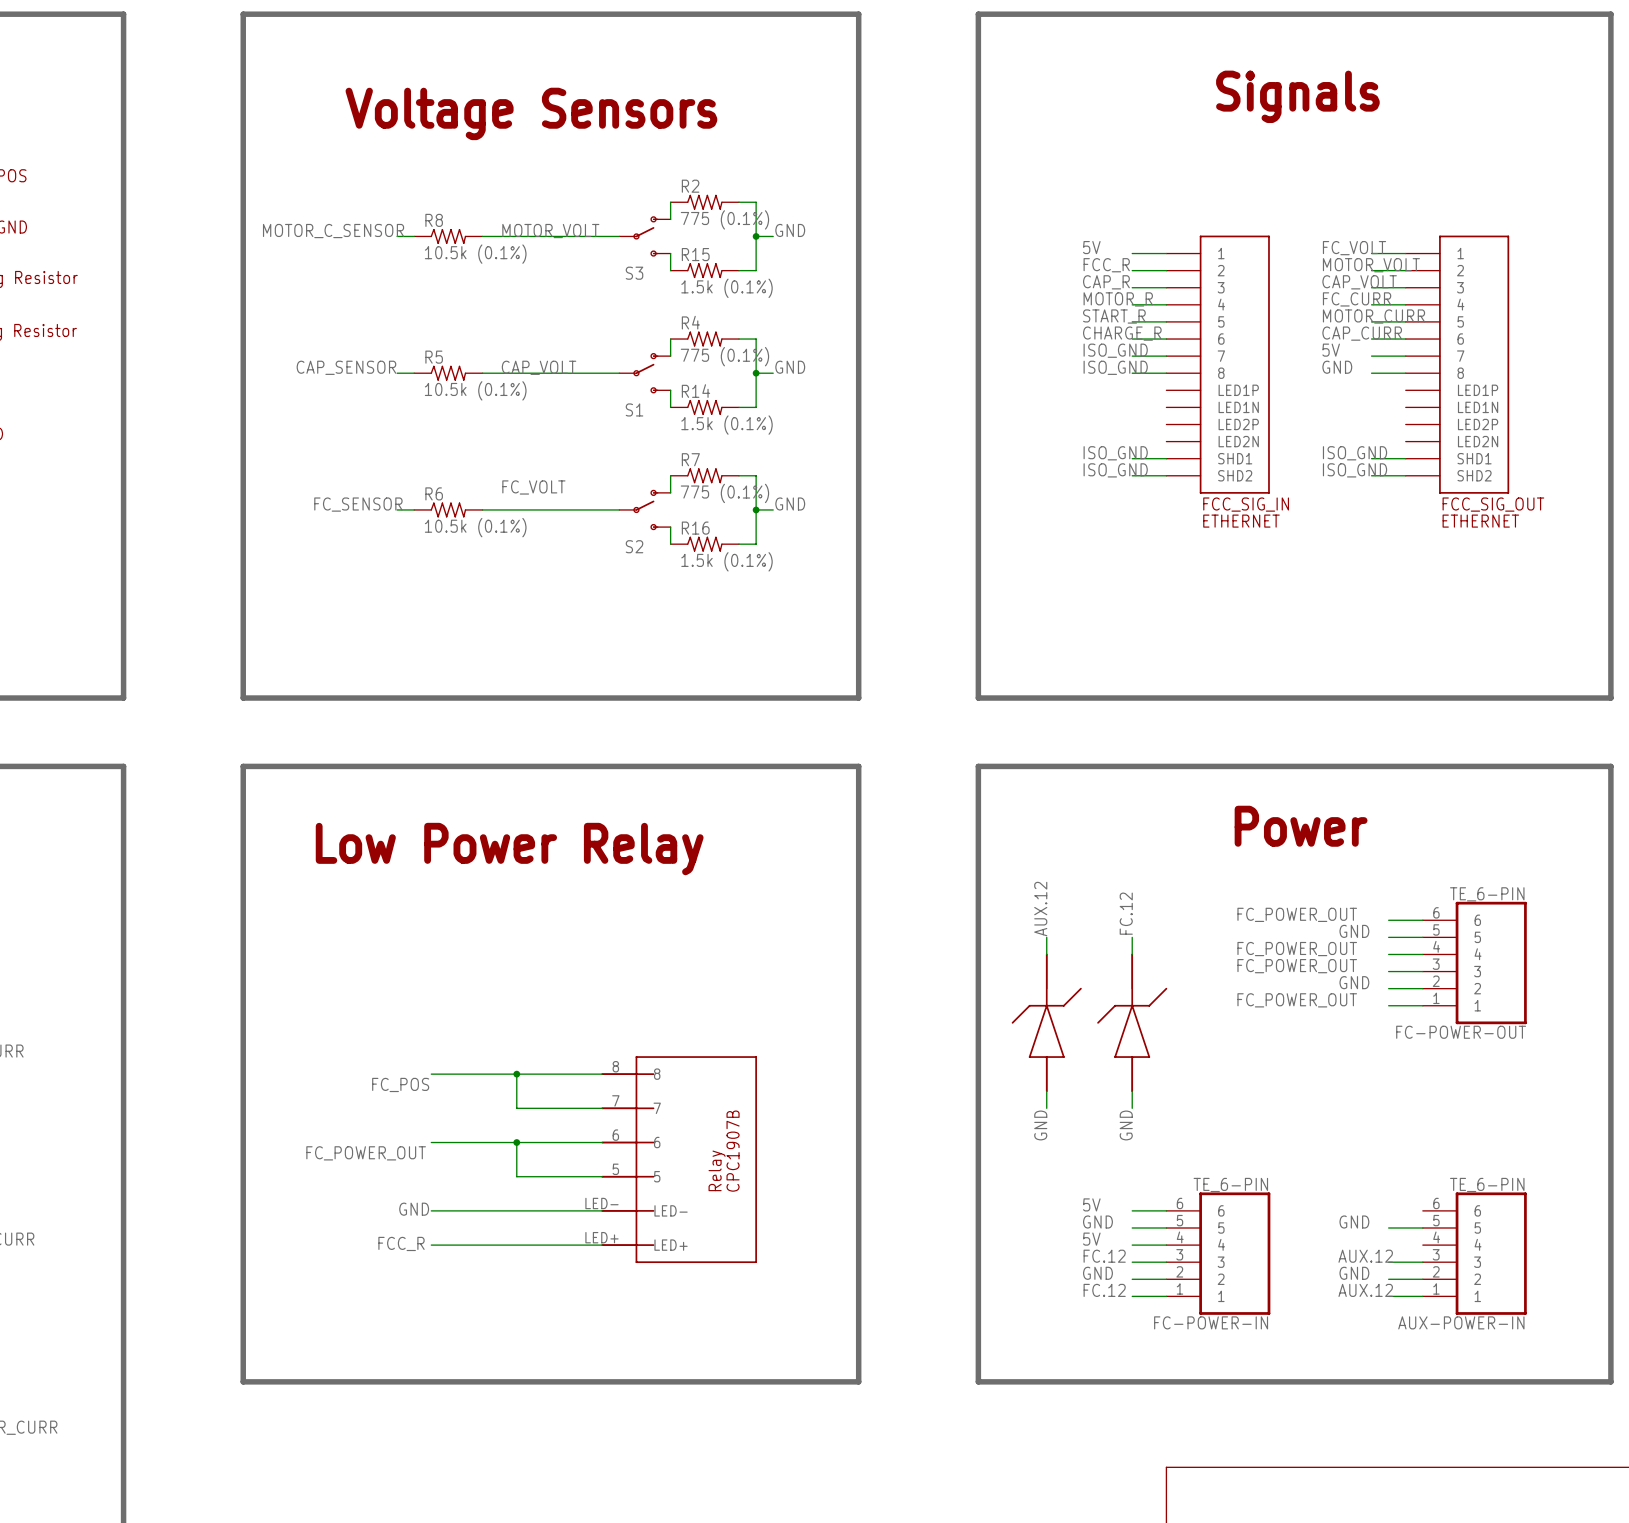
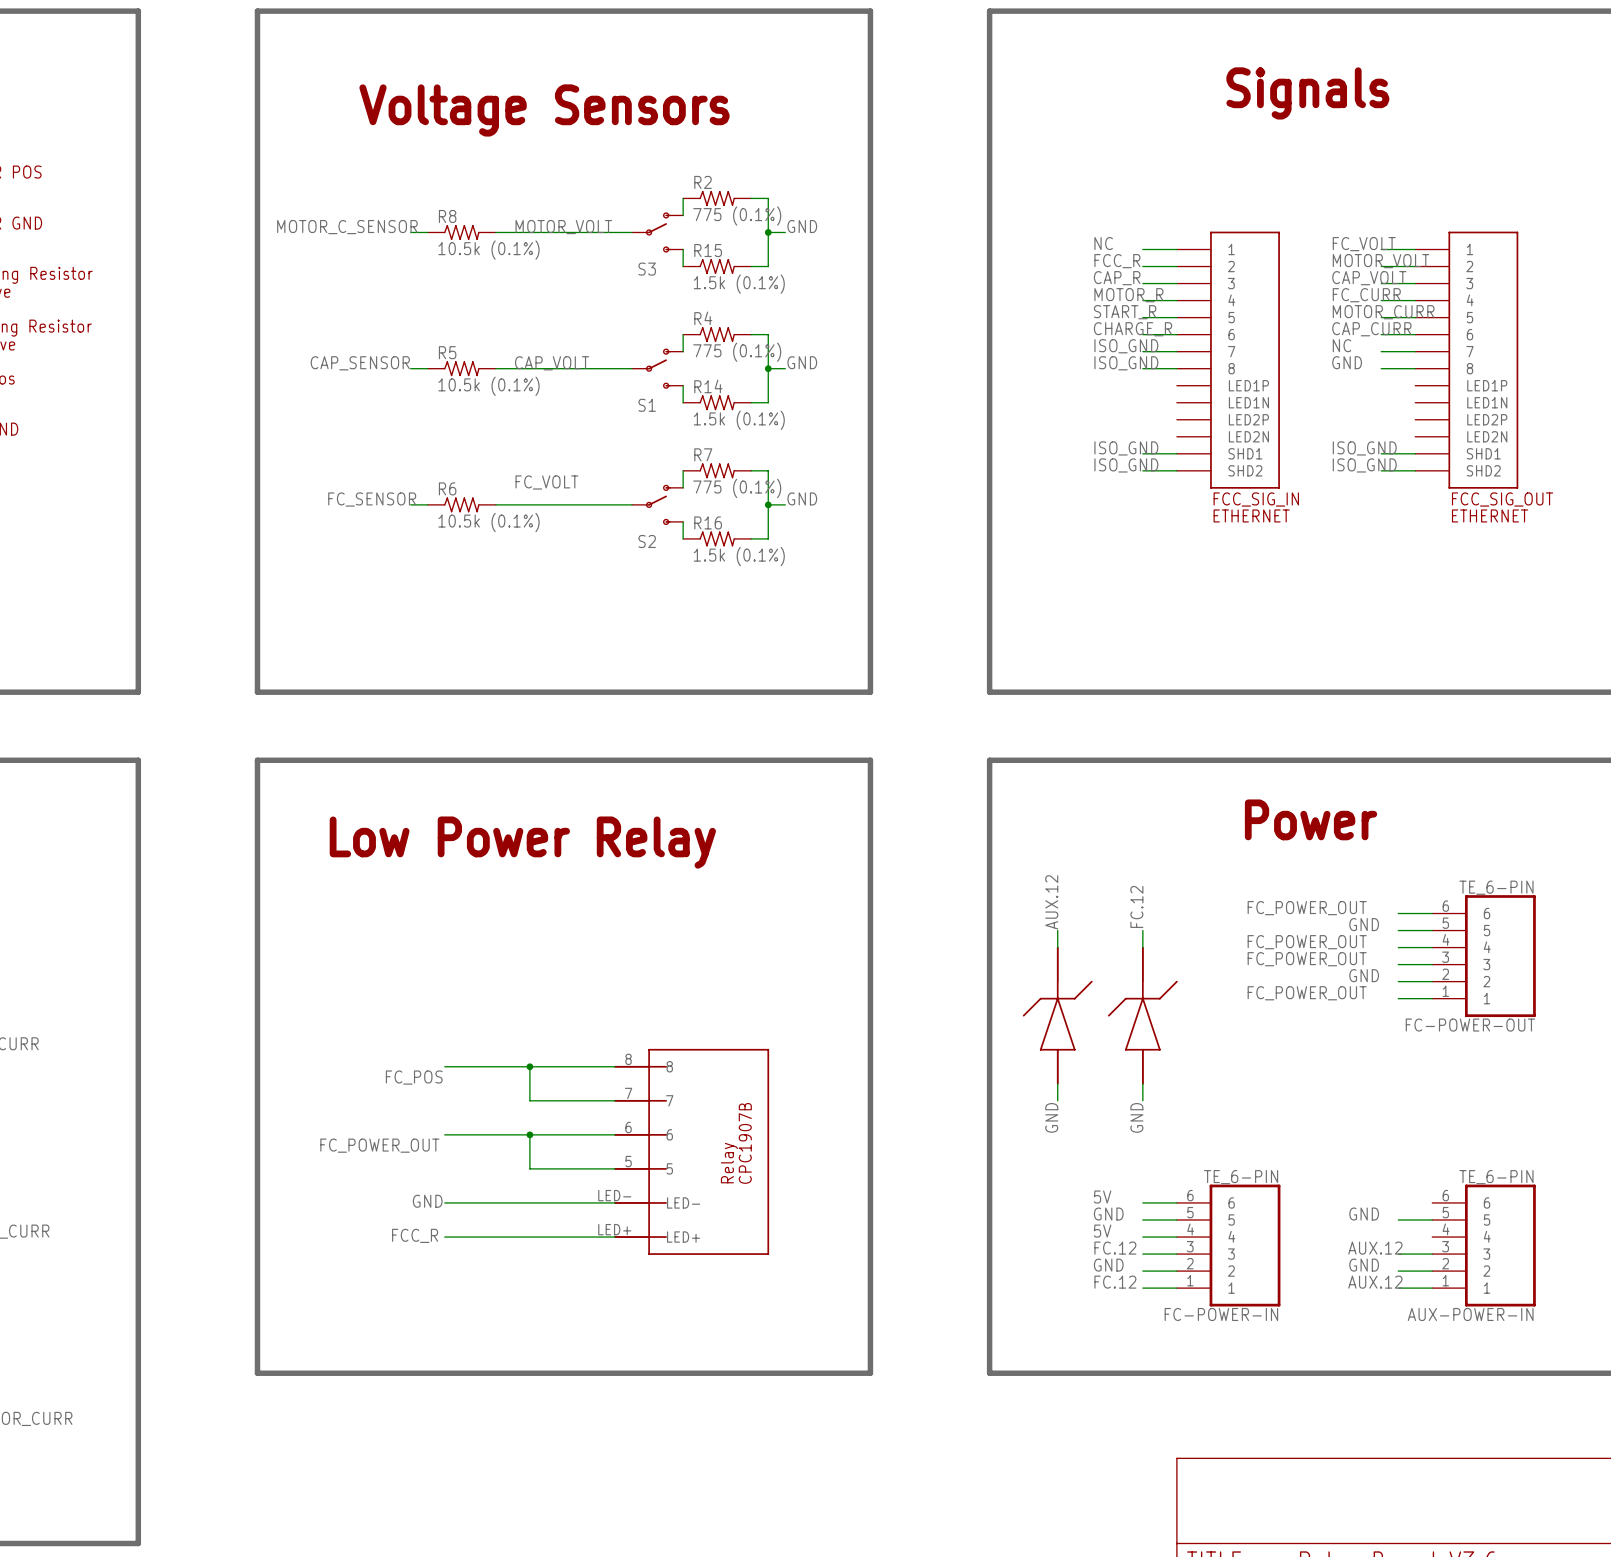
label: 5V (1091, 247) -> NC (1103, 243)
label: 5V (1331, 350) -> NC (1342, 345)

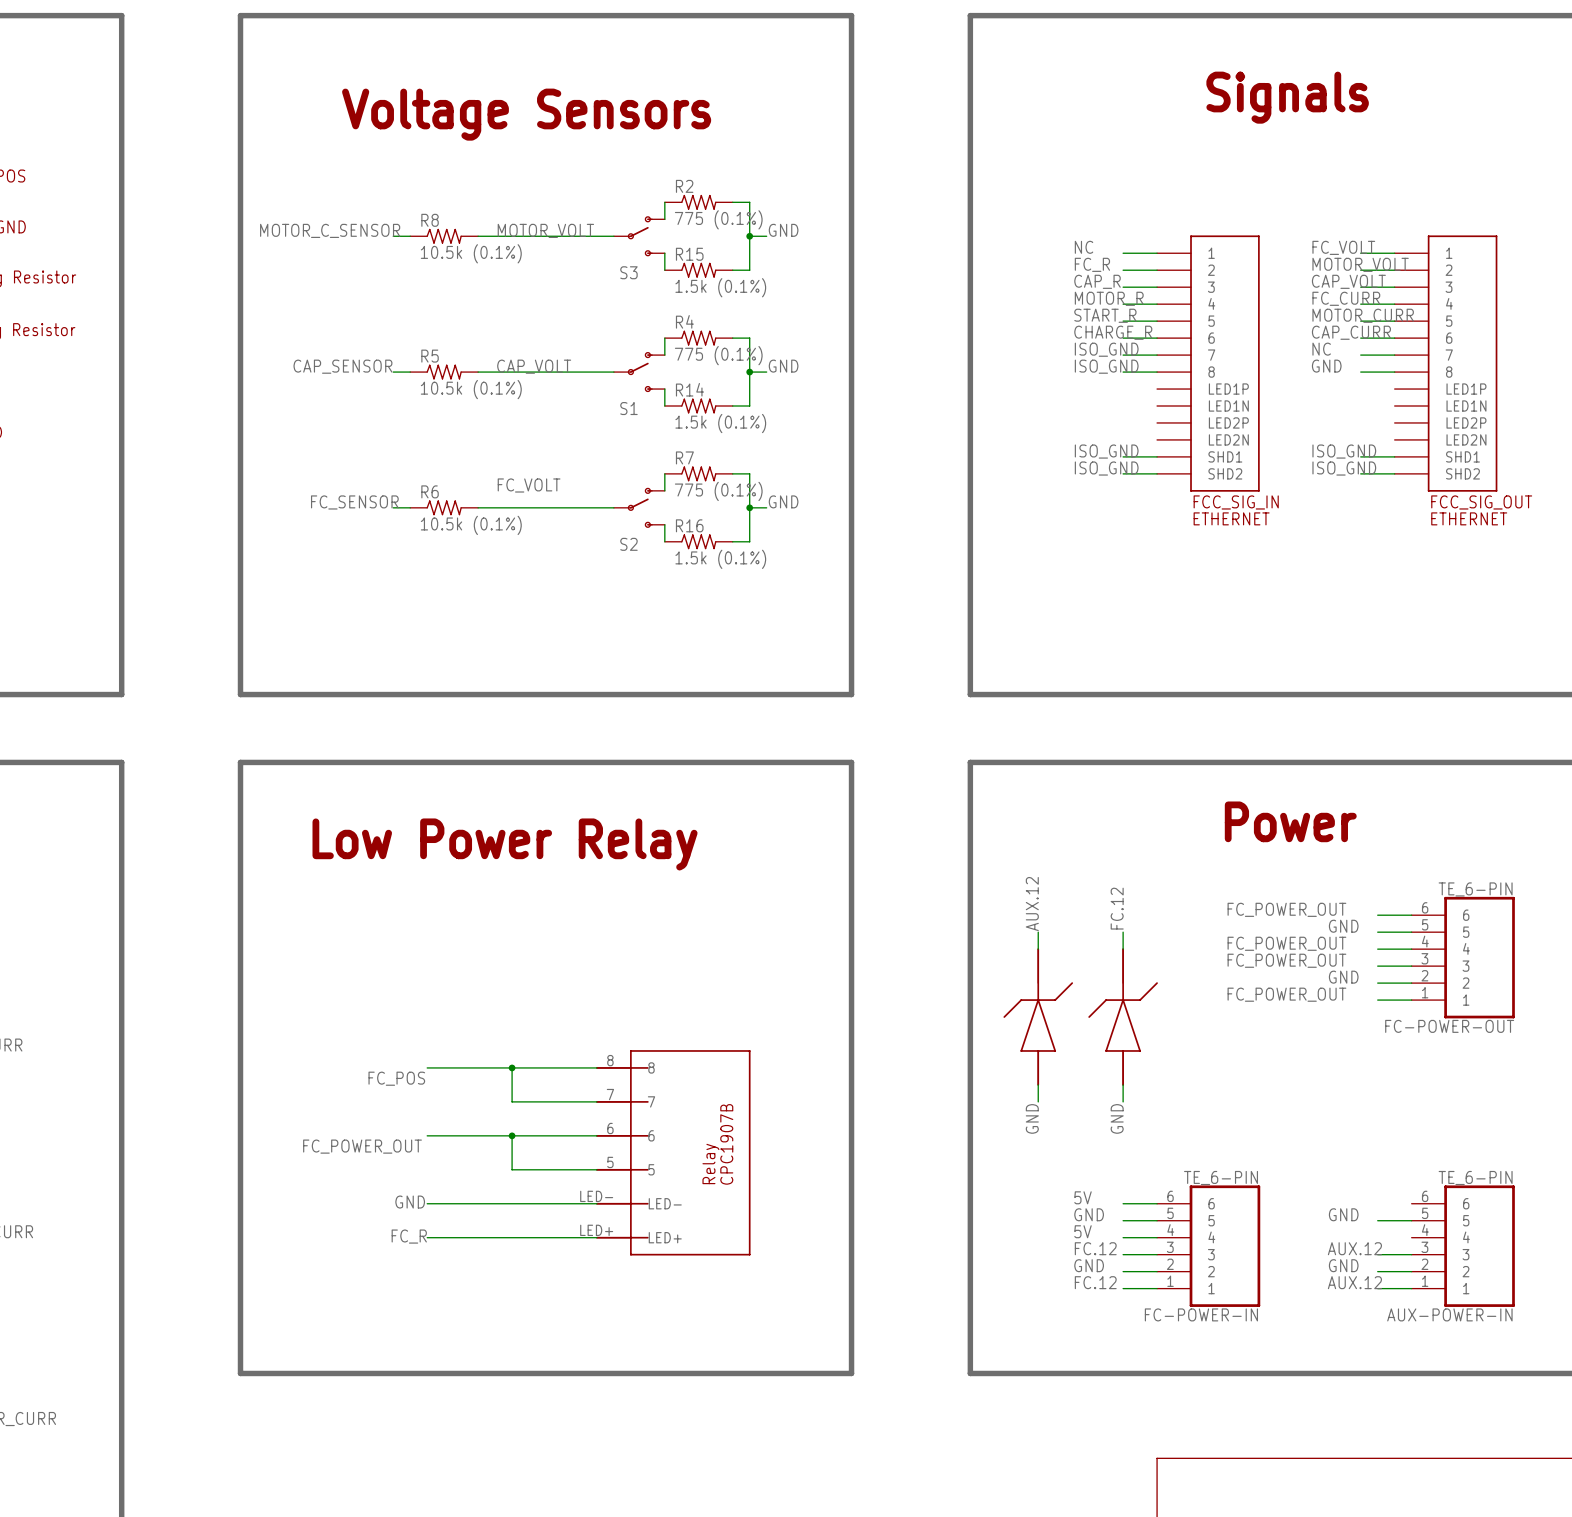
label: FCC_R (1117, 261) -> FC_R (1092, 264)
label: FCC_R (415, 1235) -> FC_R (409, 1236)

